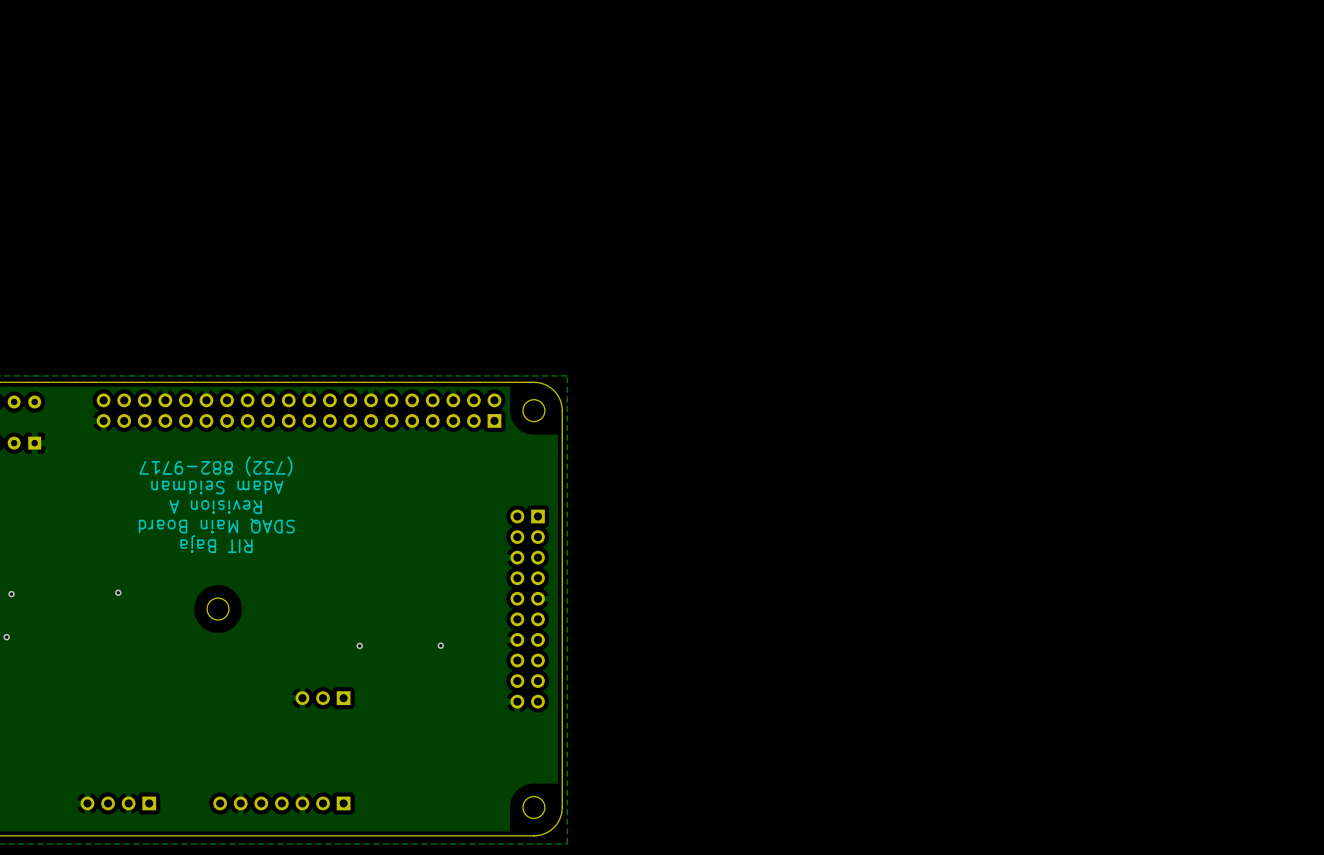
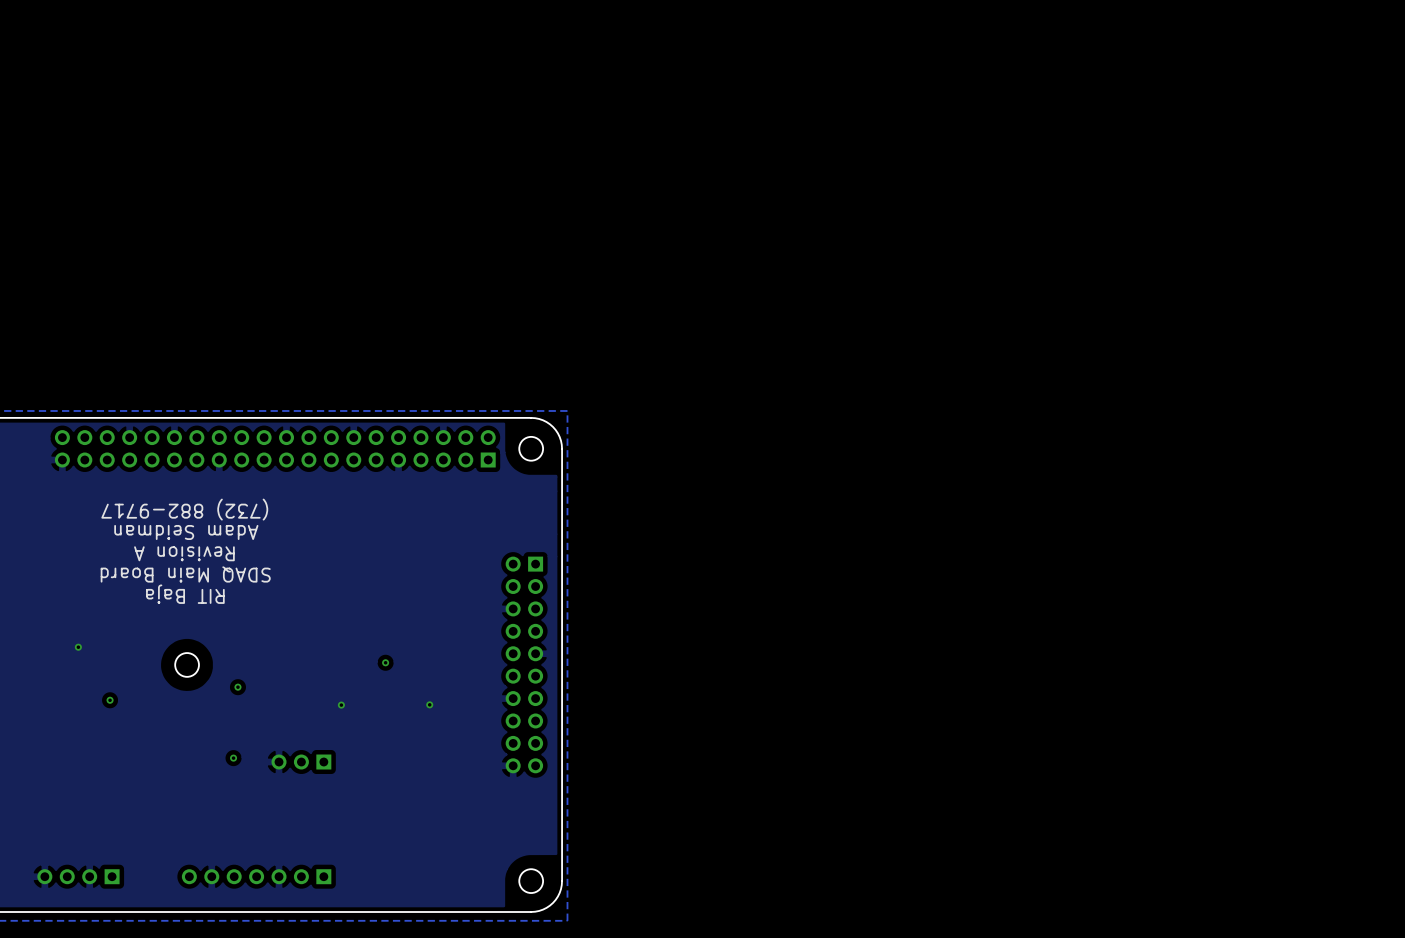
via: none -> (385, 662)
via: none -> (237, 687)
via: none -> (110, 700)
via: none -> (233, 758)

